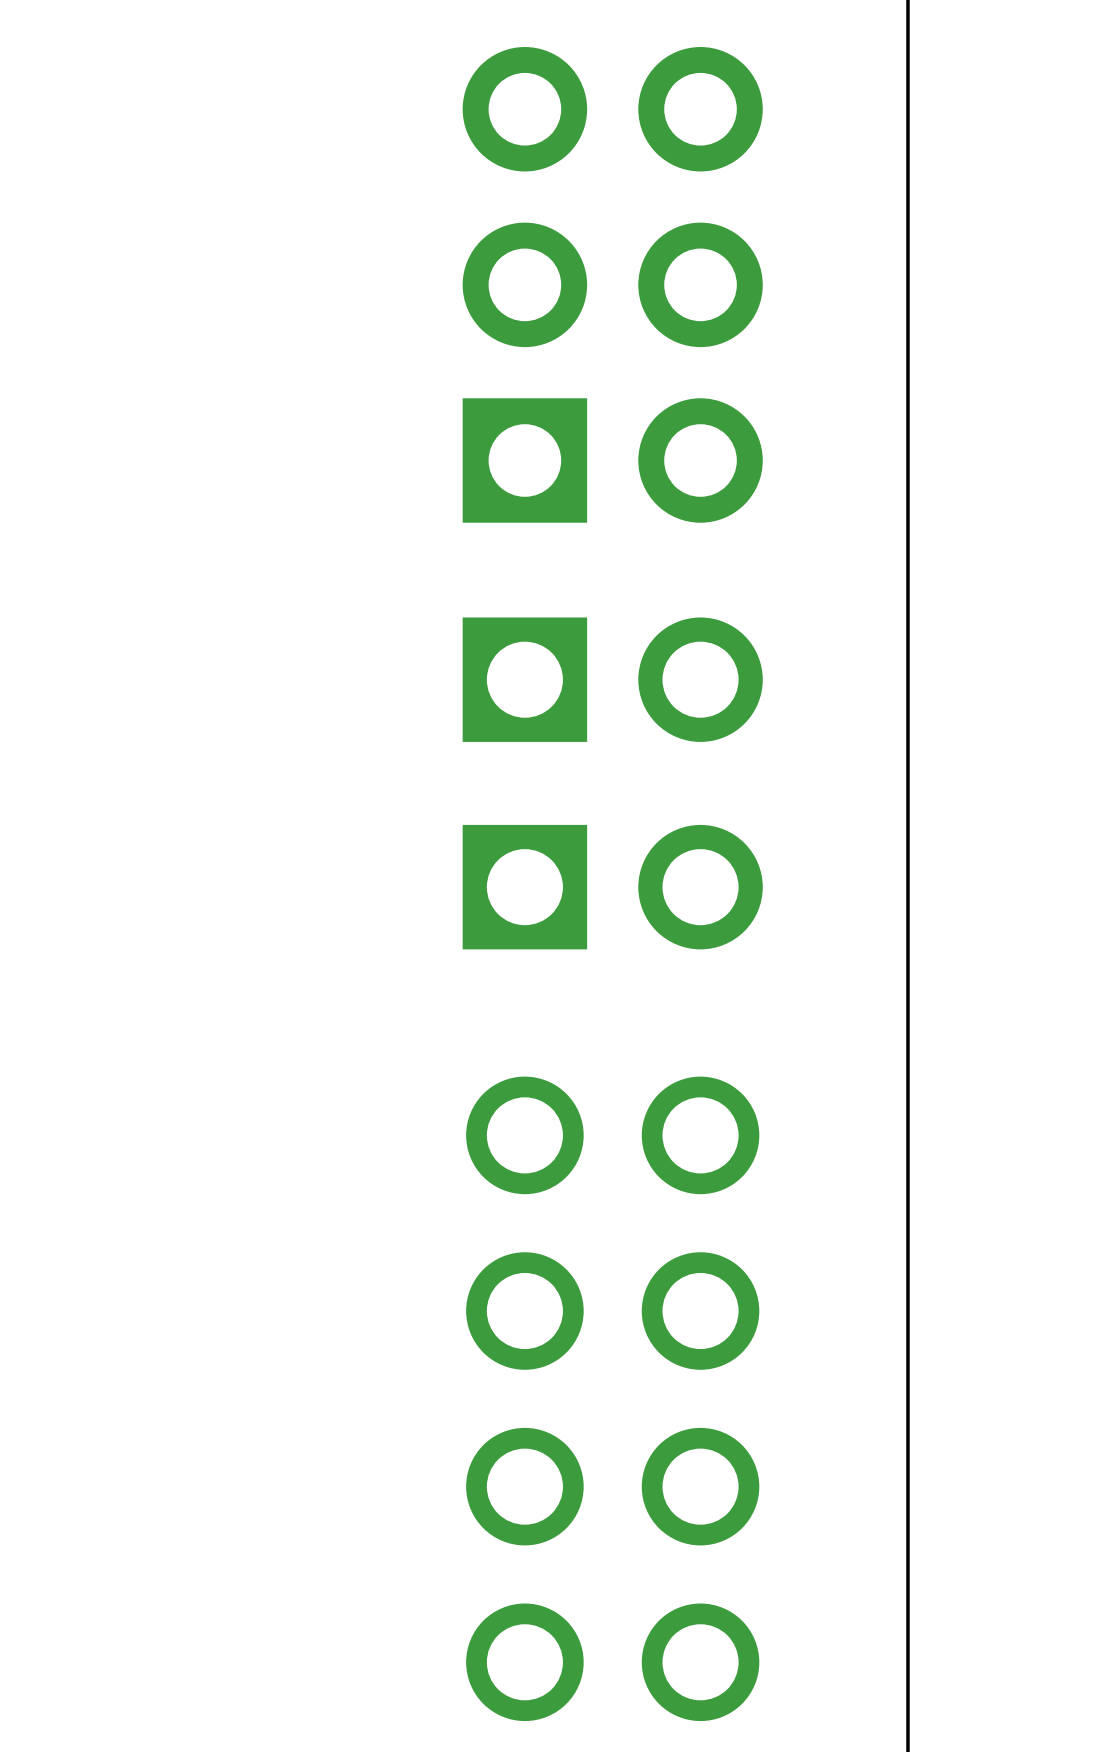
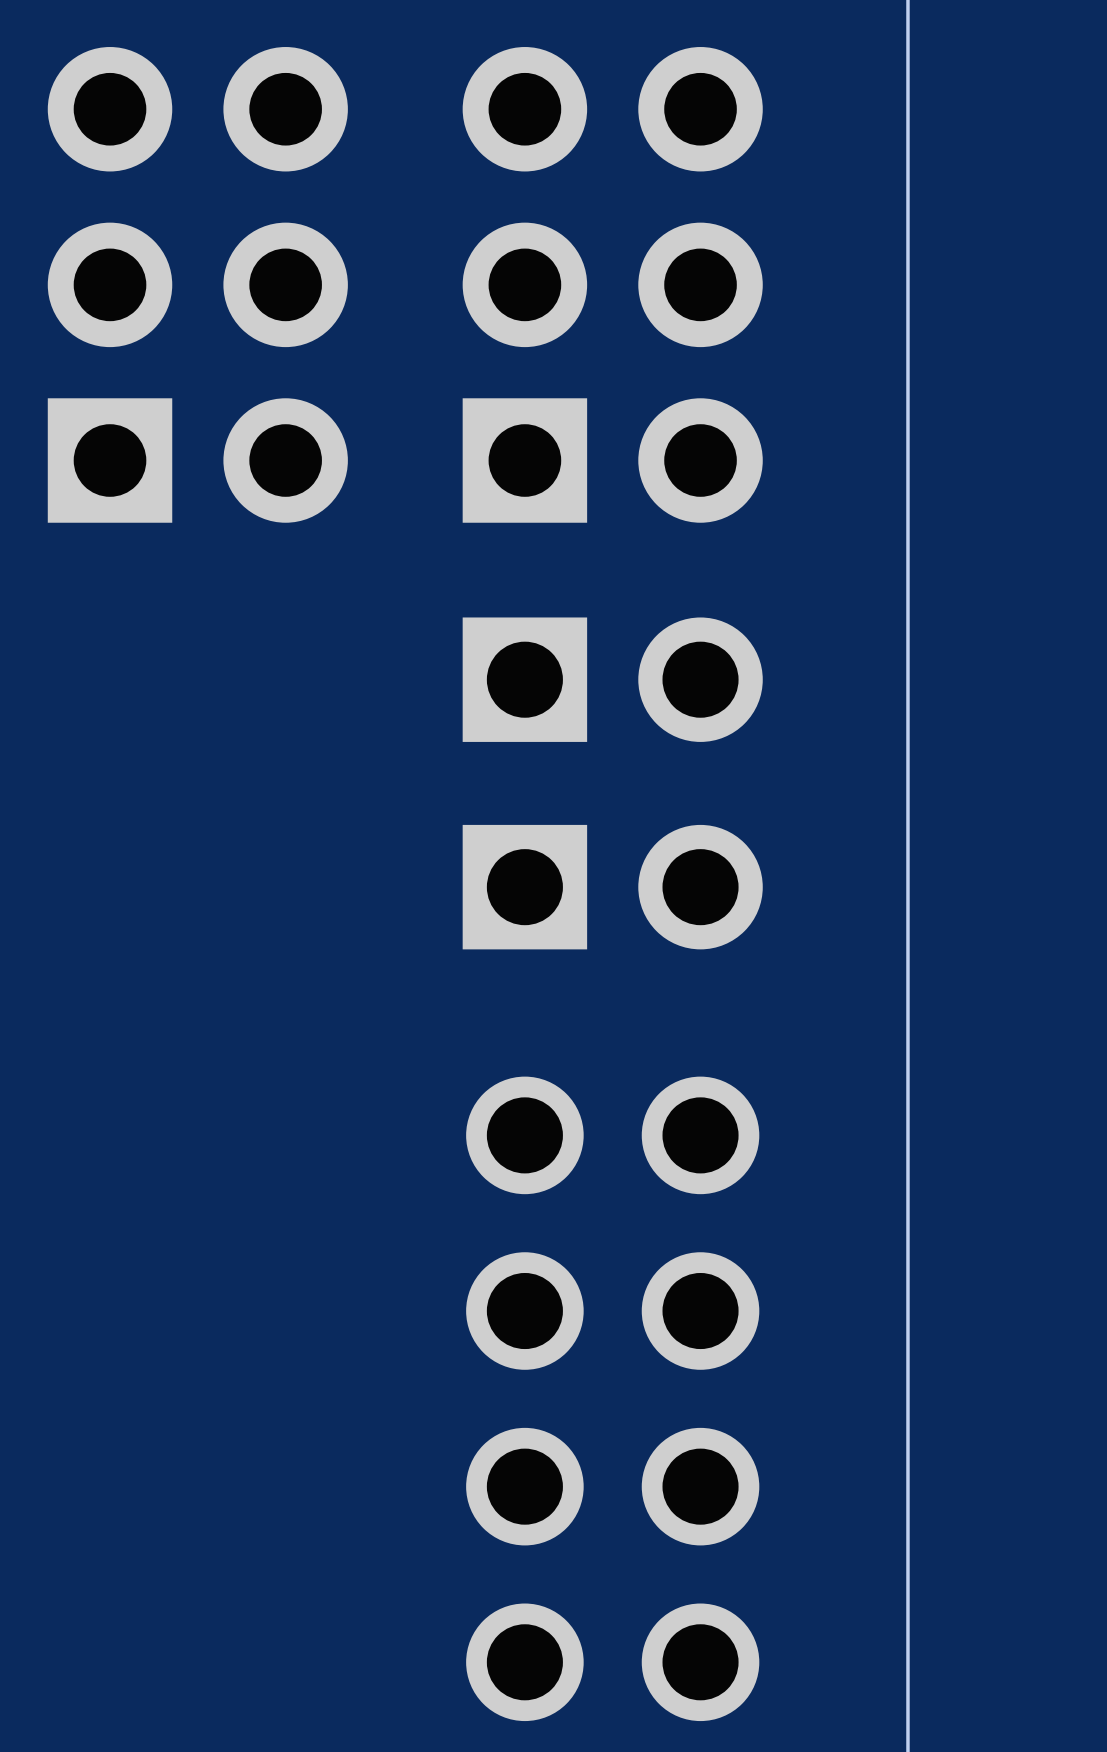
part: none -> (197, 284)

